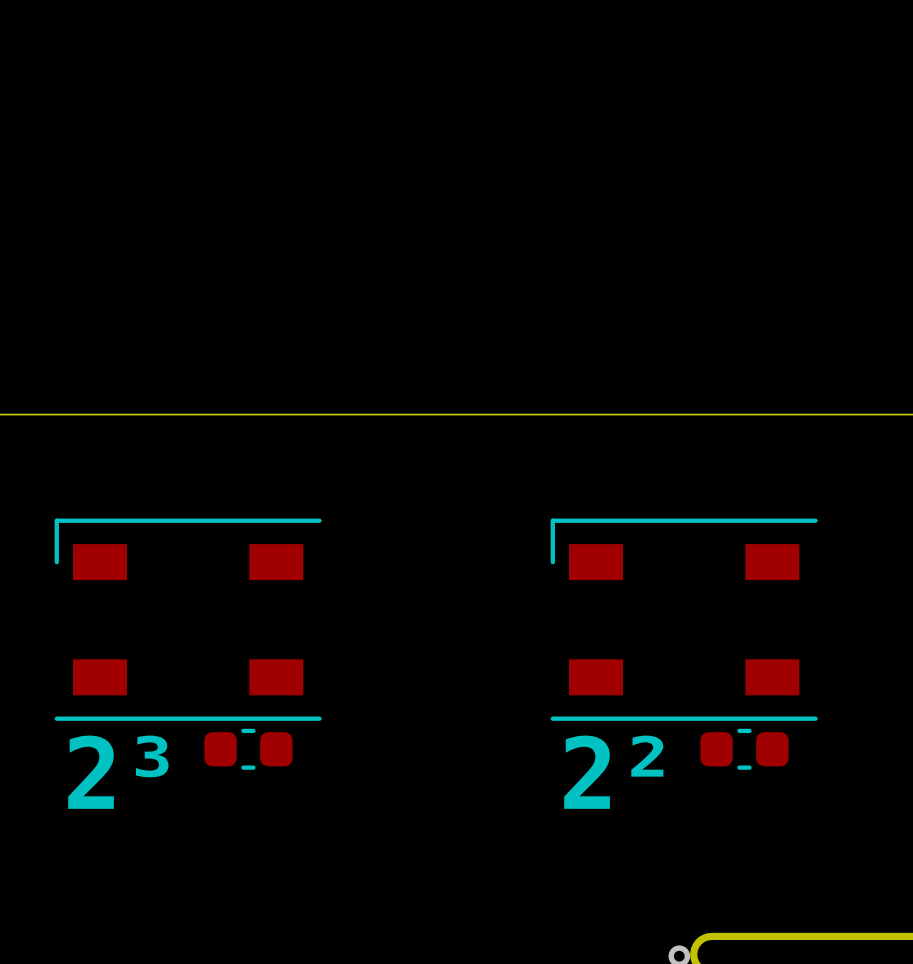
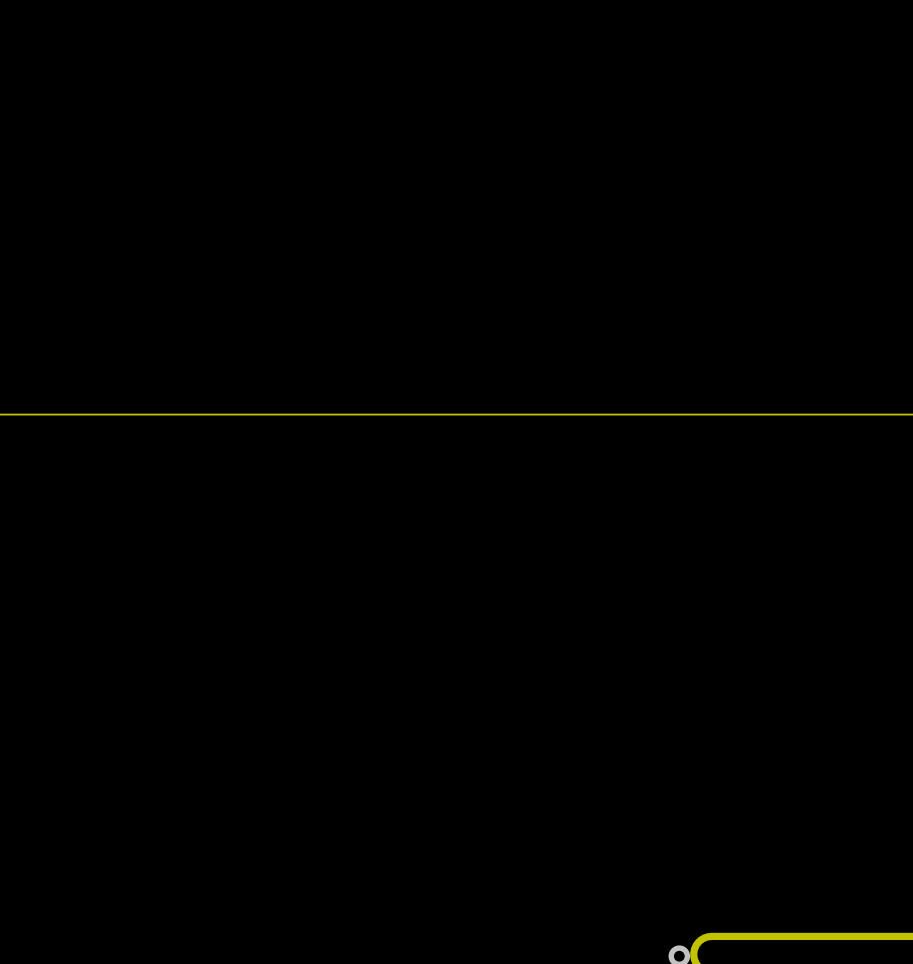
part: (188, 619) -> none
part: (684, 619) -> none
part: (248, 749) -> none
part: (744, 749) -> none
text: 2³ (118, 772) -> none
text: 2² (613, 772) -> none

